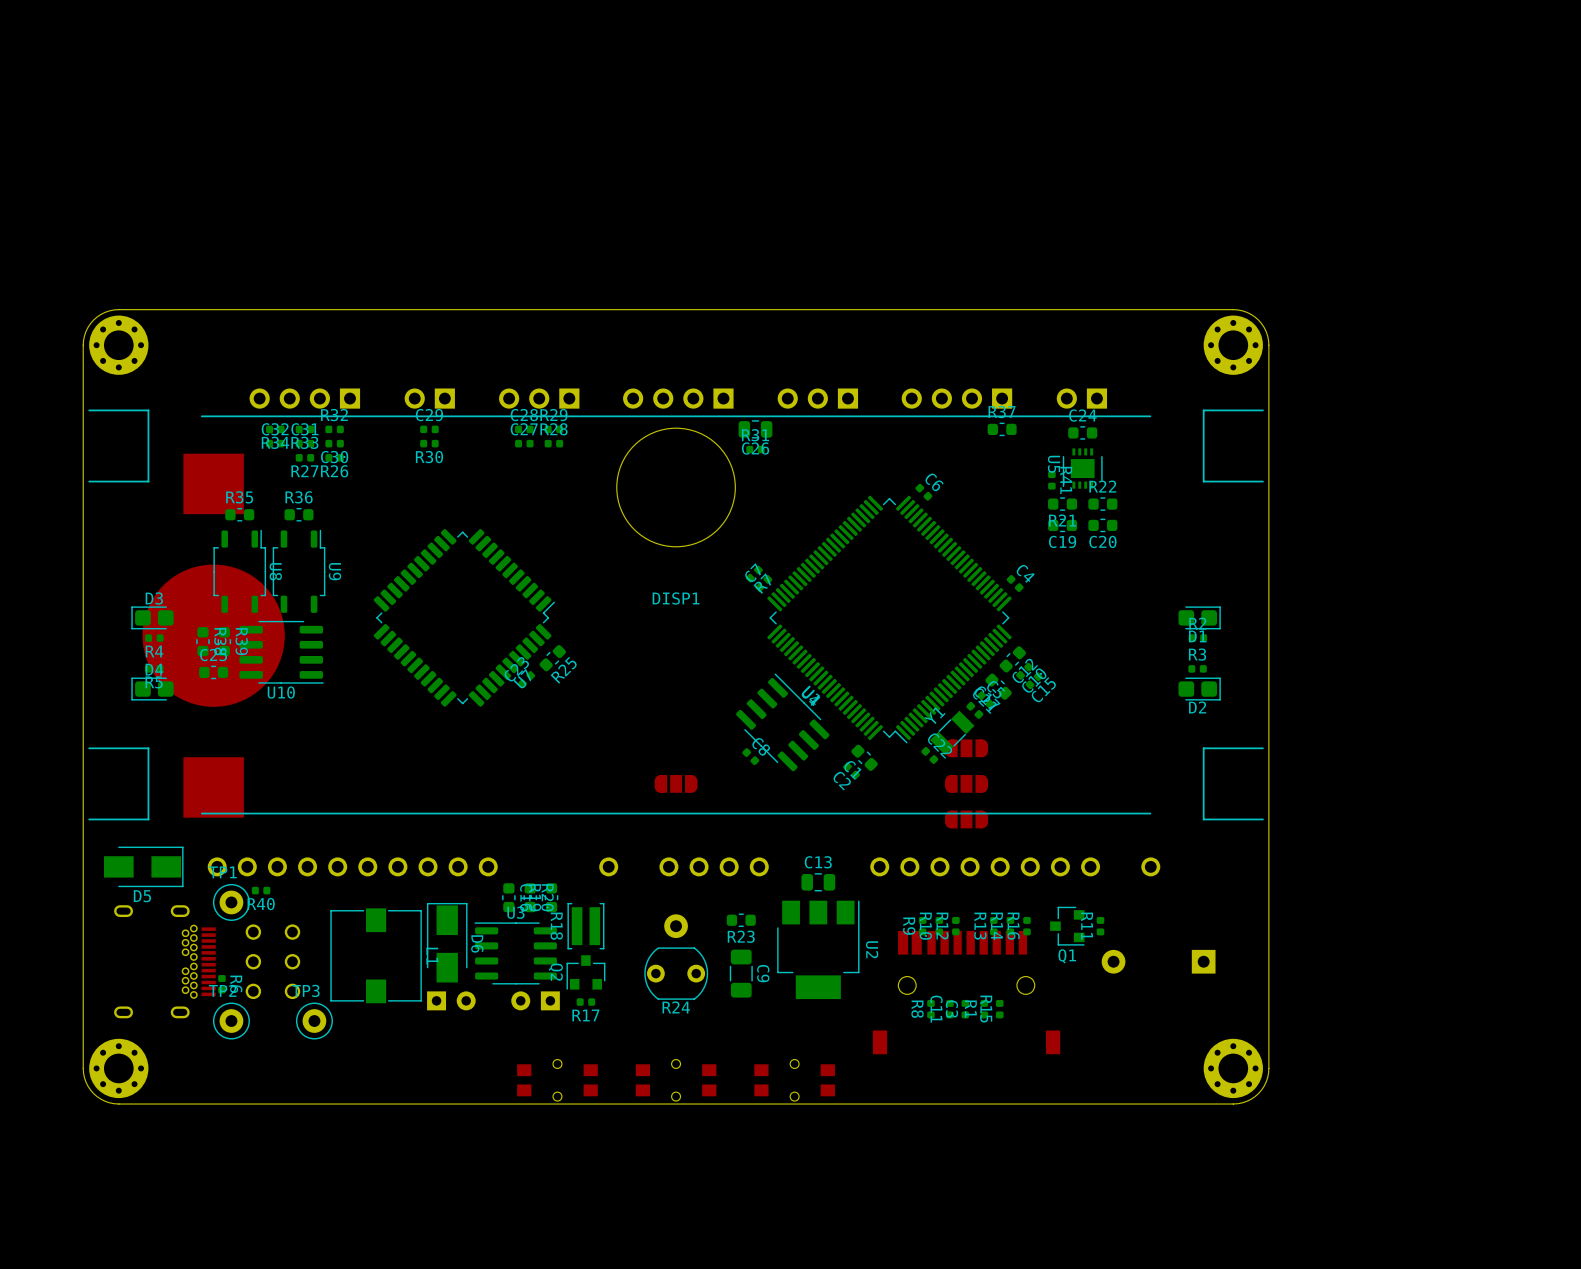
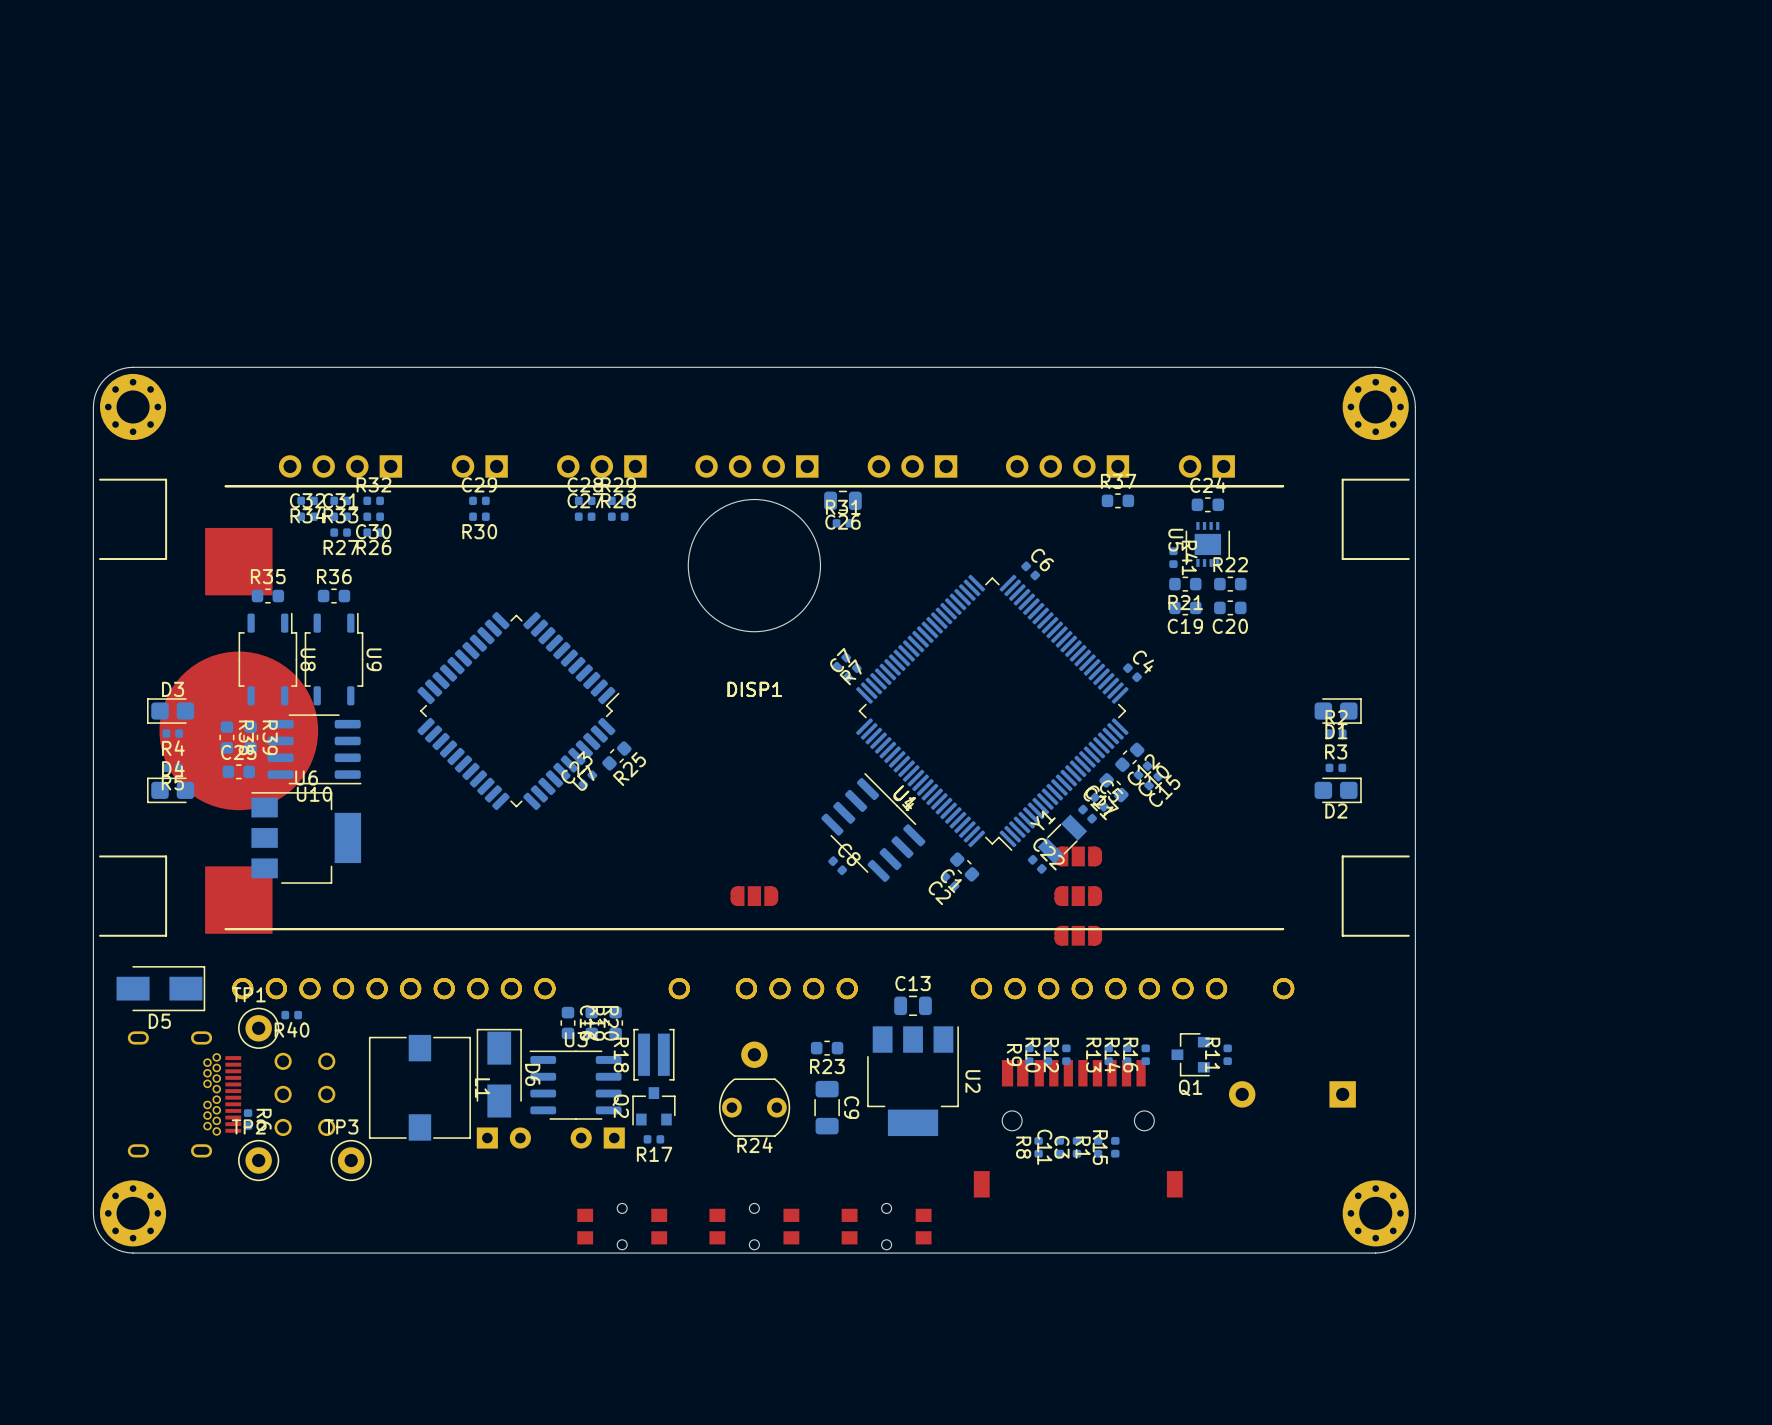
DISP1: none -> (759, 742)
U6: none -> (306, 837)

